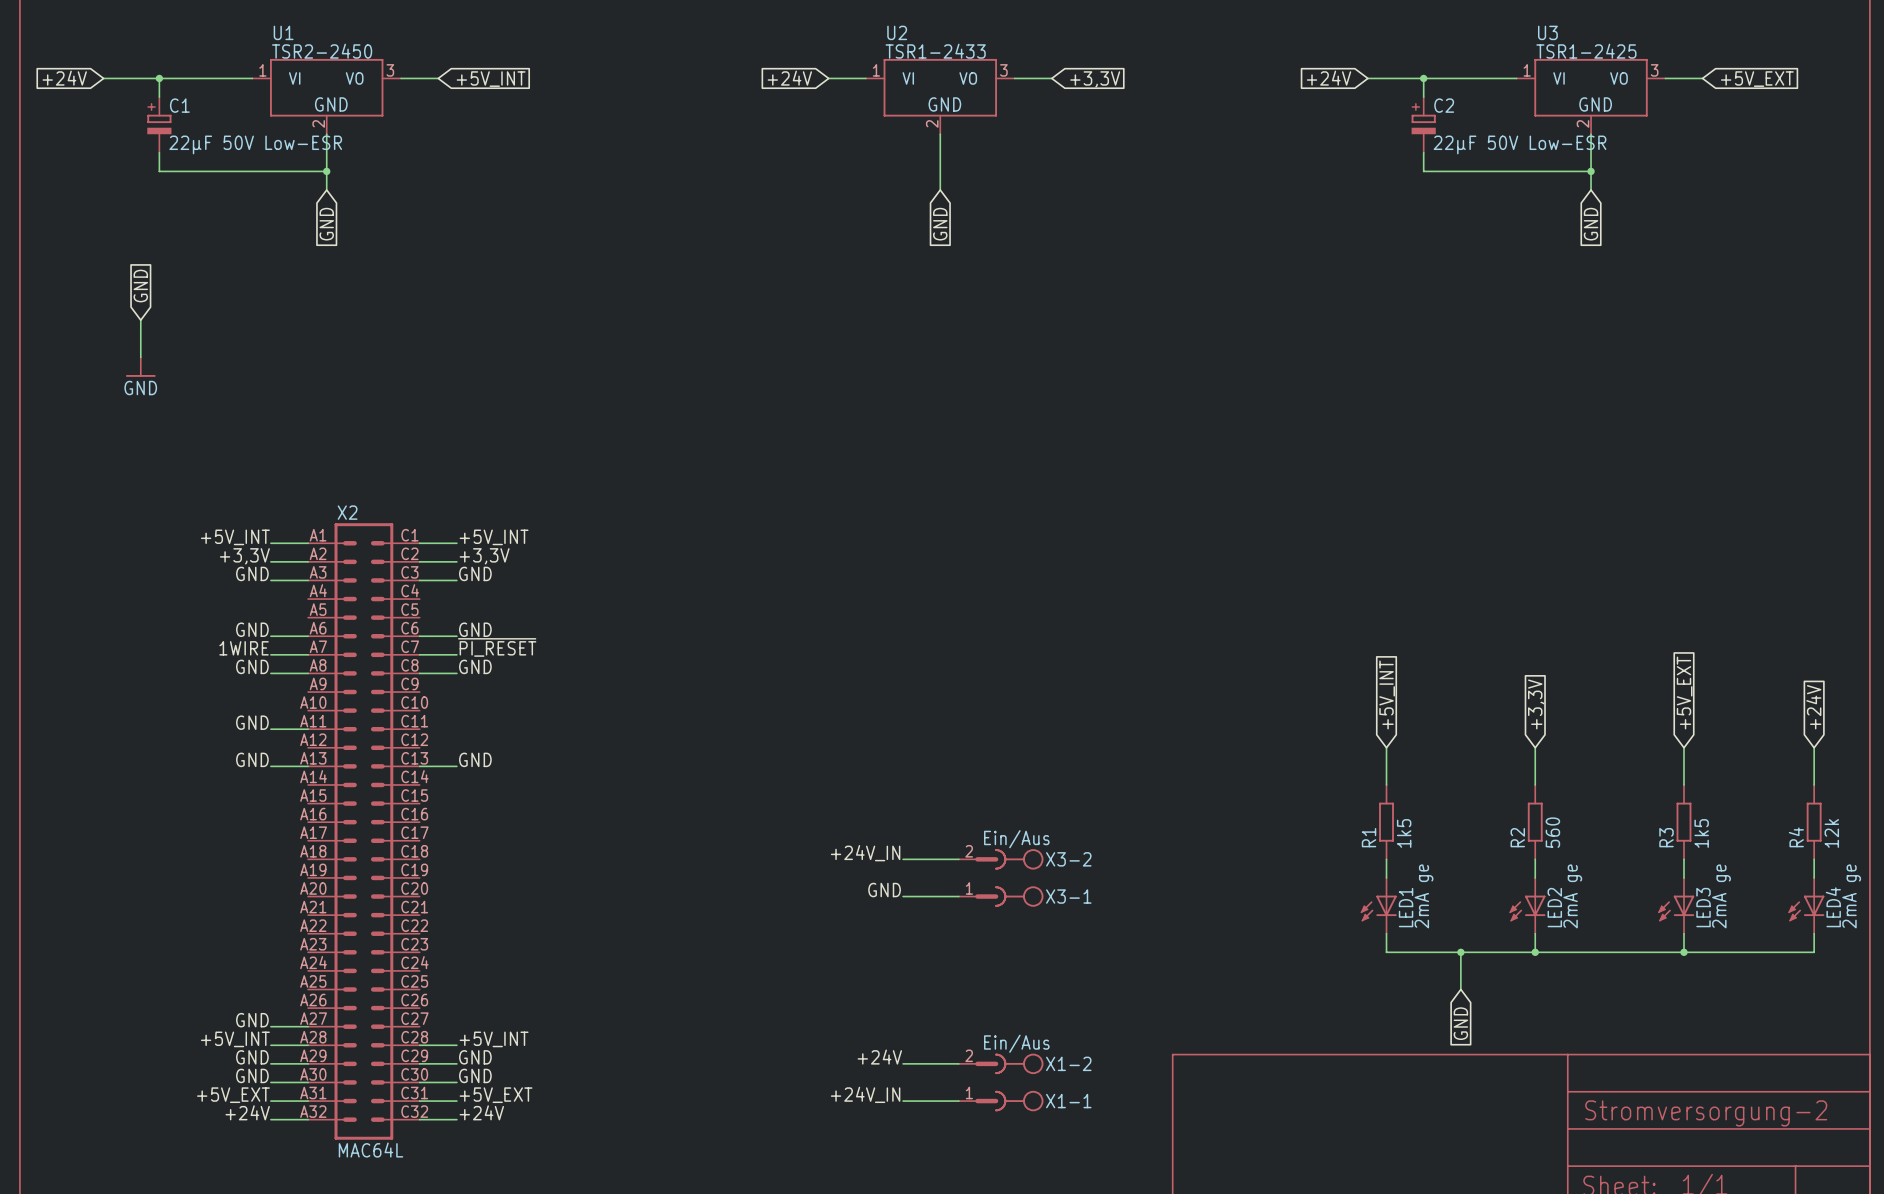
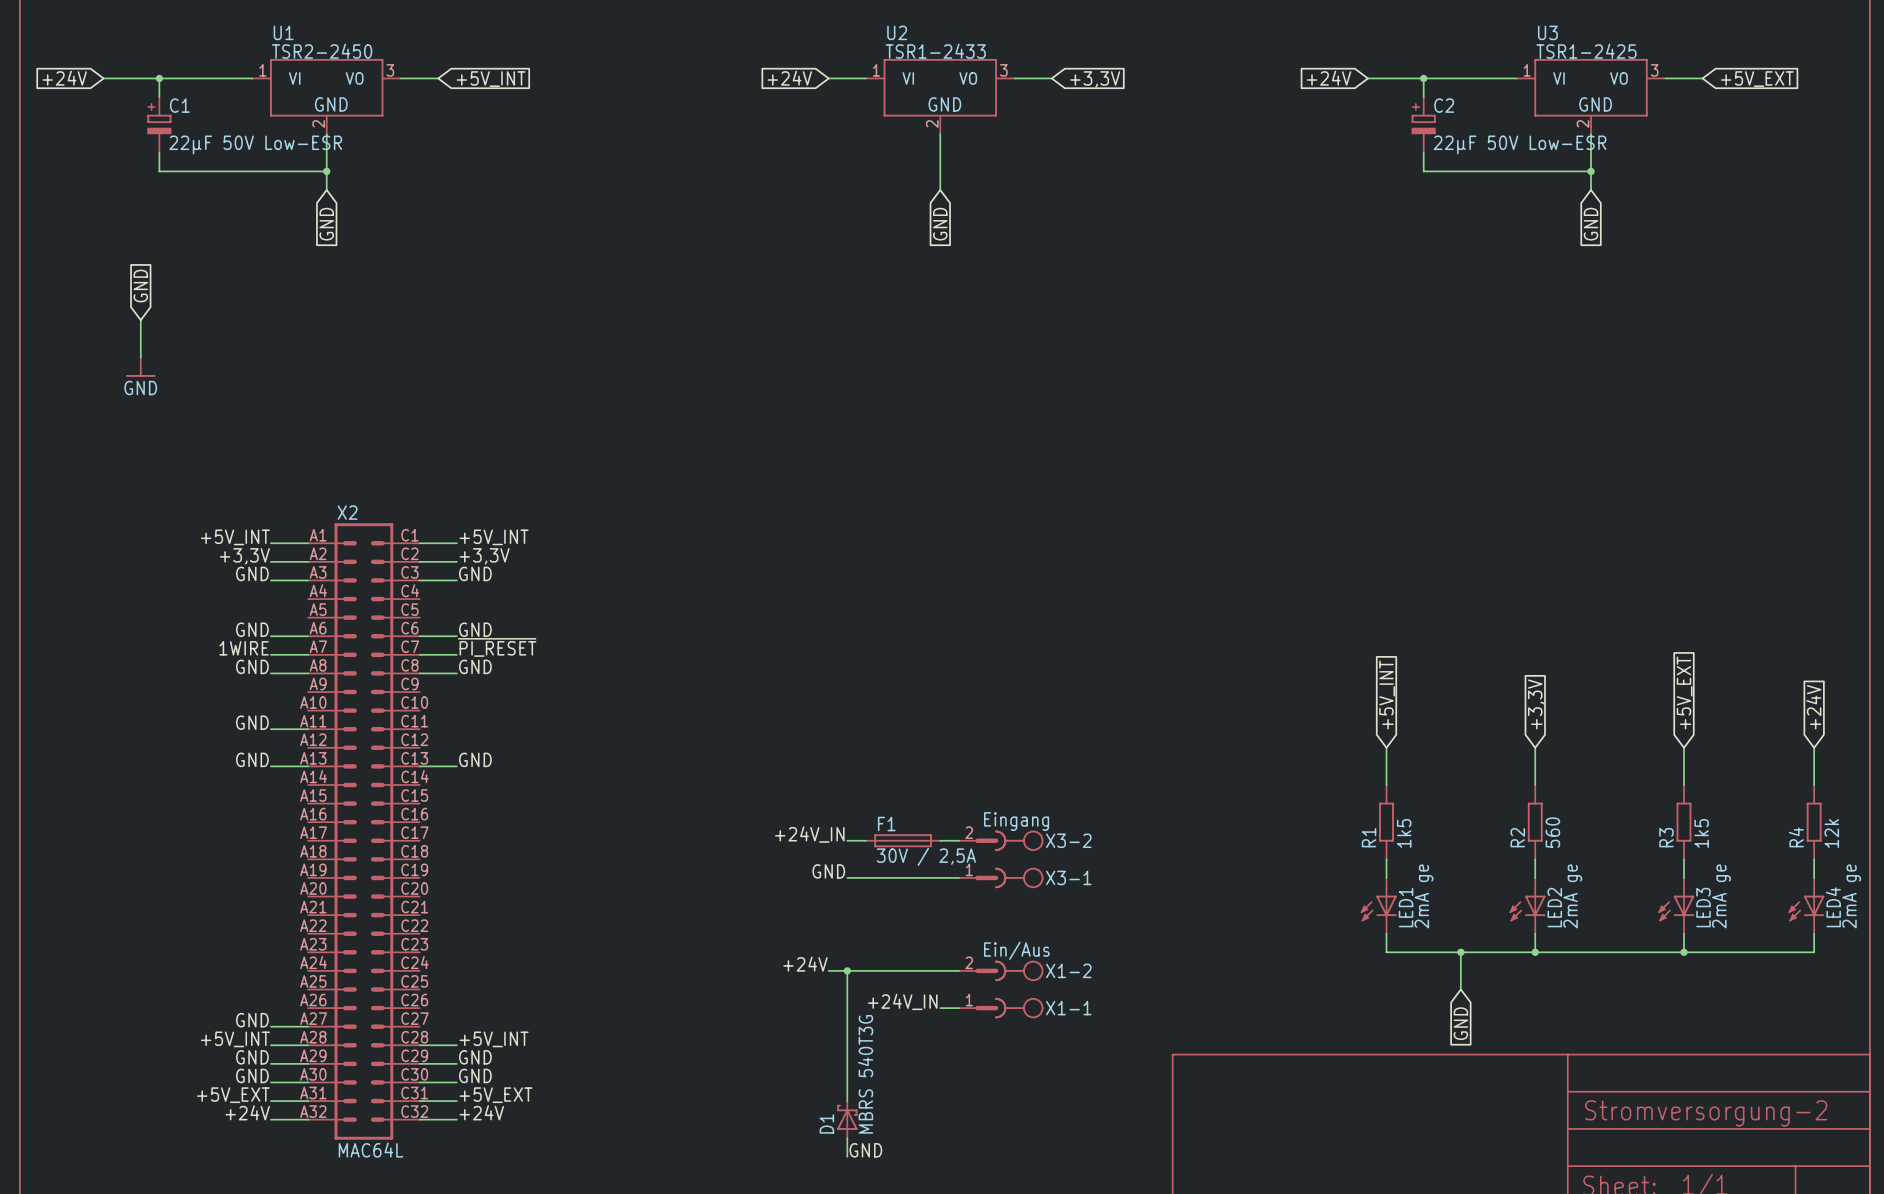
X3-2 value: Ein/Aus (1016, 839) -> Eingang (1016, 821)
wire: none -> (847, 840) (865, 840)
F1: none -> 30V / 2,5A (903, 840)
wire: none -> (940, 840) (958, 840)
label position: +24V_IN (865, 853) -> +24V_IN (809, 834)
wire: (903, 859) (958, 859) -> none
X3-2 position: (1001, 859) -> (1001, 840)
wire: none -> (847, 877) (958, 877)
label position: GND (884, 890) -> GND (828, 871)
wire: (903, 896) (958, 896) -> none
X3-1 position: (1001, 896) -> (1001, 877)
wire: none -> (828, 970) (958, 970)
wire: none -> (847, 970) (847, 1101)
junction: none -> (847, 970)
label: none -> +24V_IN (902, 1001)
wire: none -> (940, 1008) (958, 1008)
label position: +24V (879, 1057) -> +24V (805, 964)
wire: (903, 1063) (958, 1063) -> none
X1-2 position: (1001, 1063) -> (1001, 970)
label: +24V_IN (865, 1094) -> none
wire: (903, 1101) (958, 1101) -> none
X1-1 position: (1001, 1101) -> (1001, 1008)
D1: none -> MBRS 540T3G (847, 1119)
wire: none -> (847, 1138) (847, 1156)
label: none -> GND (865, 1150)

